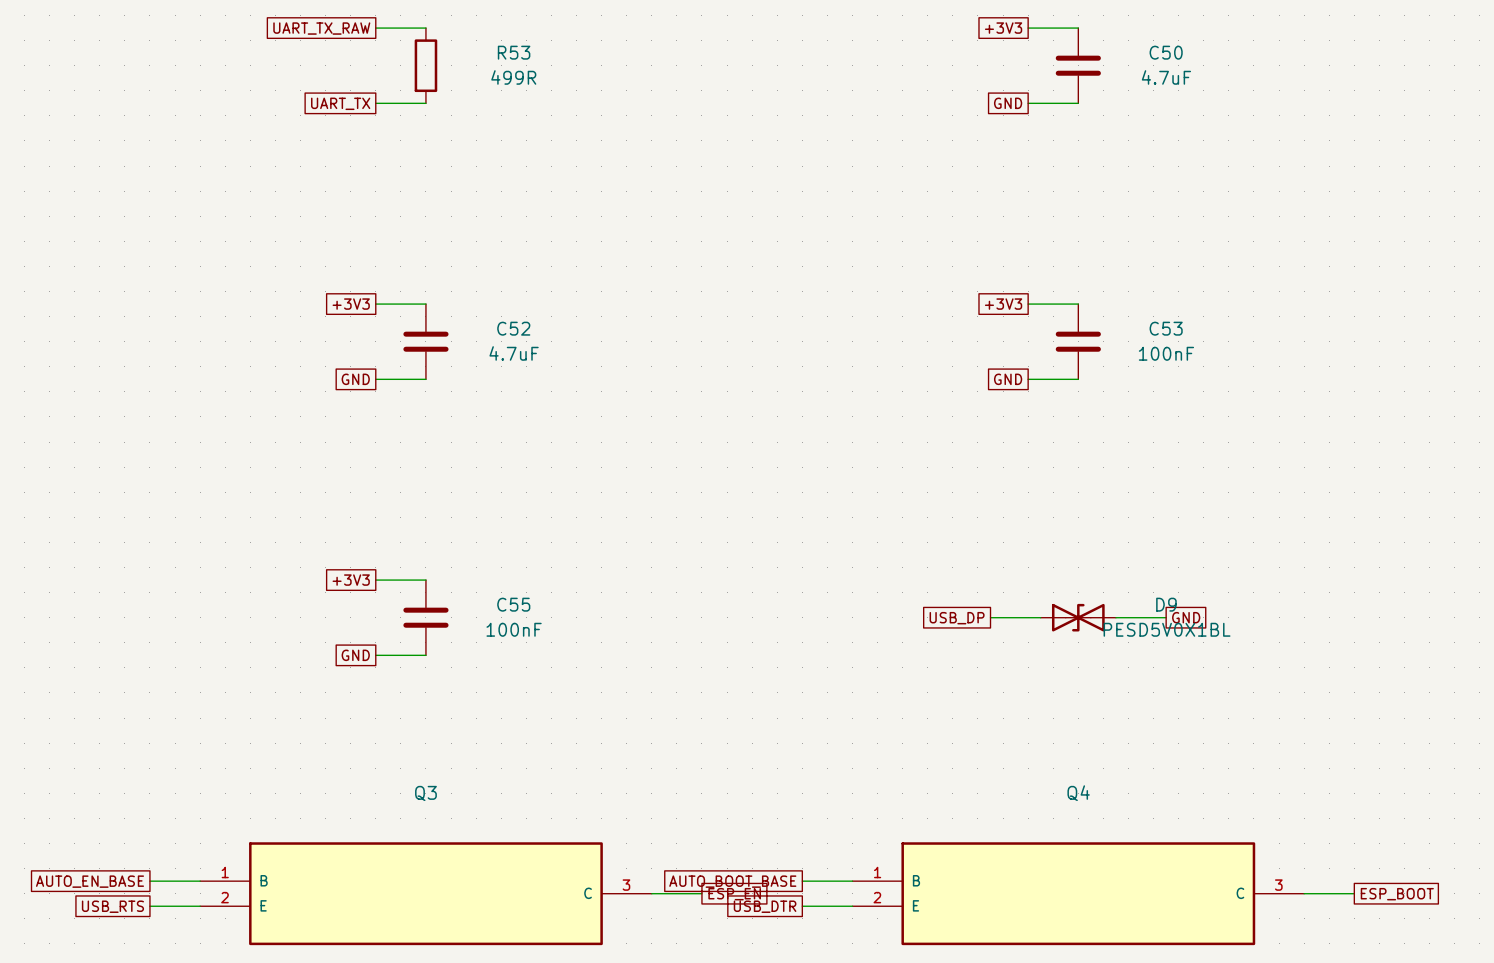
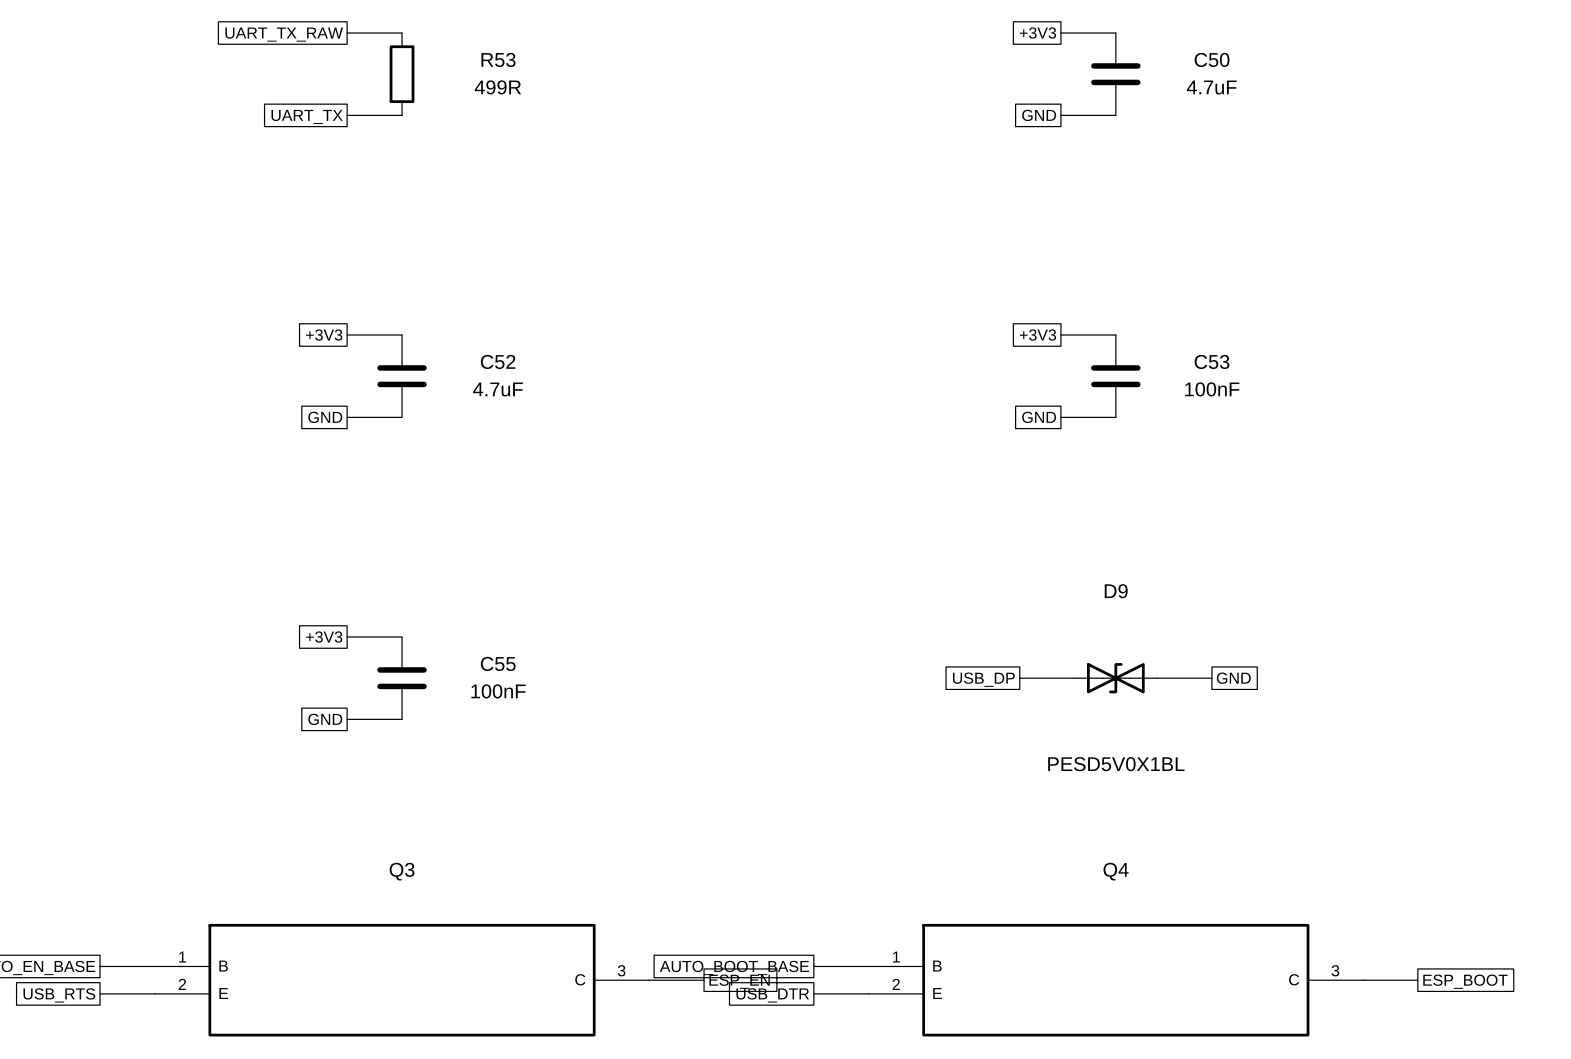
D9 name position: D9 (1166, 604) -> D9 (1116, 591)
D9 value position: PESD5V0X1BL (1167, 629) -> PESD5V0X1BL (1116, 764)

